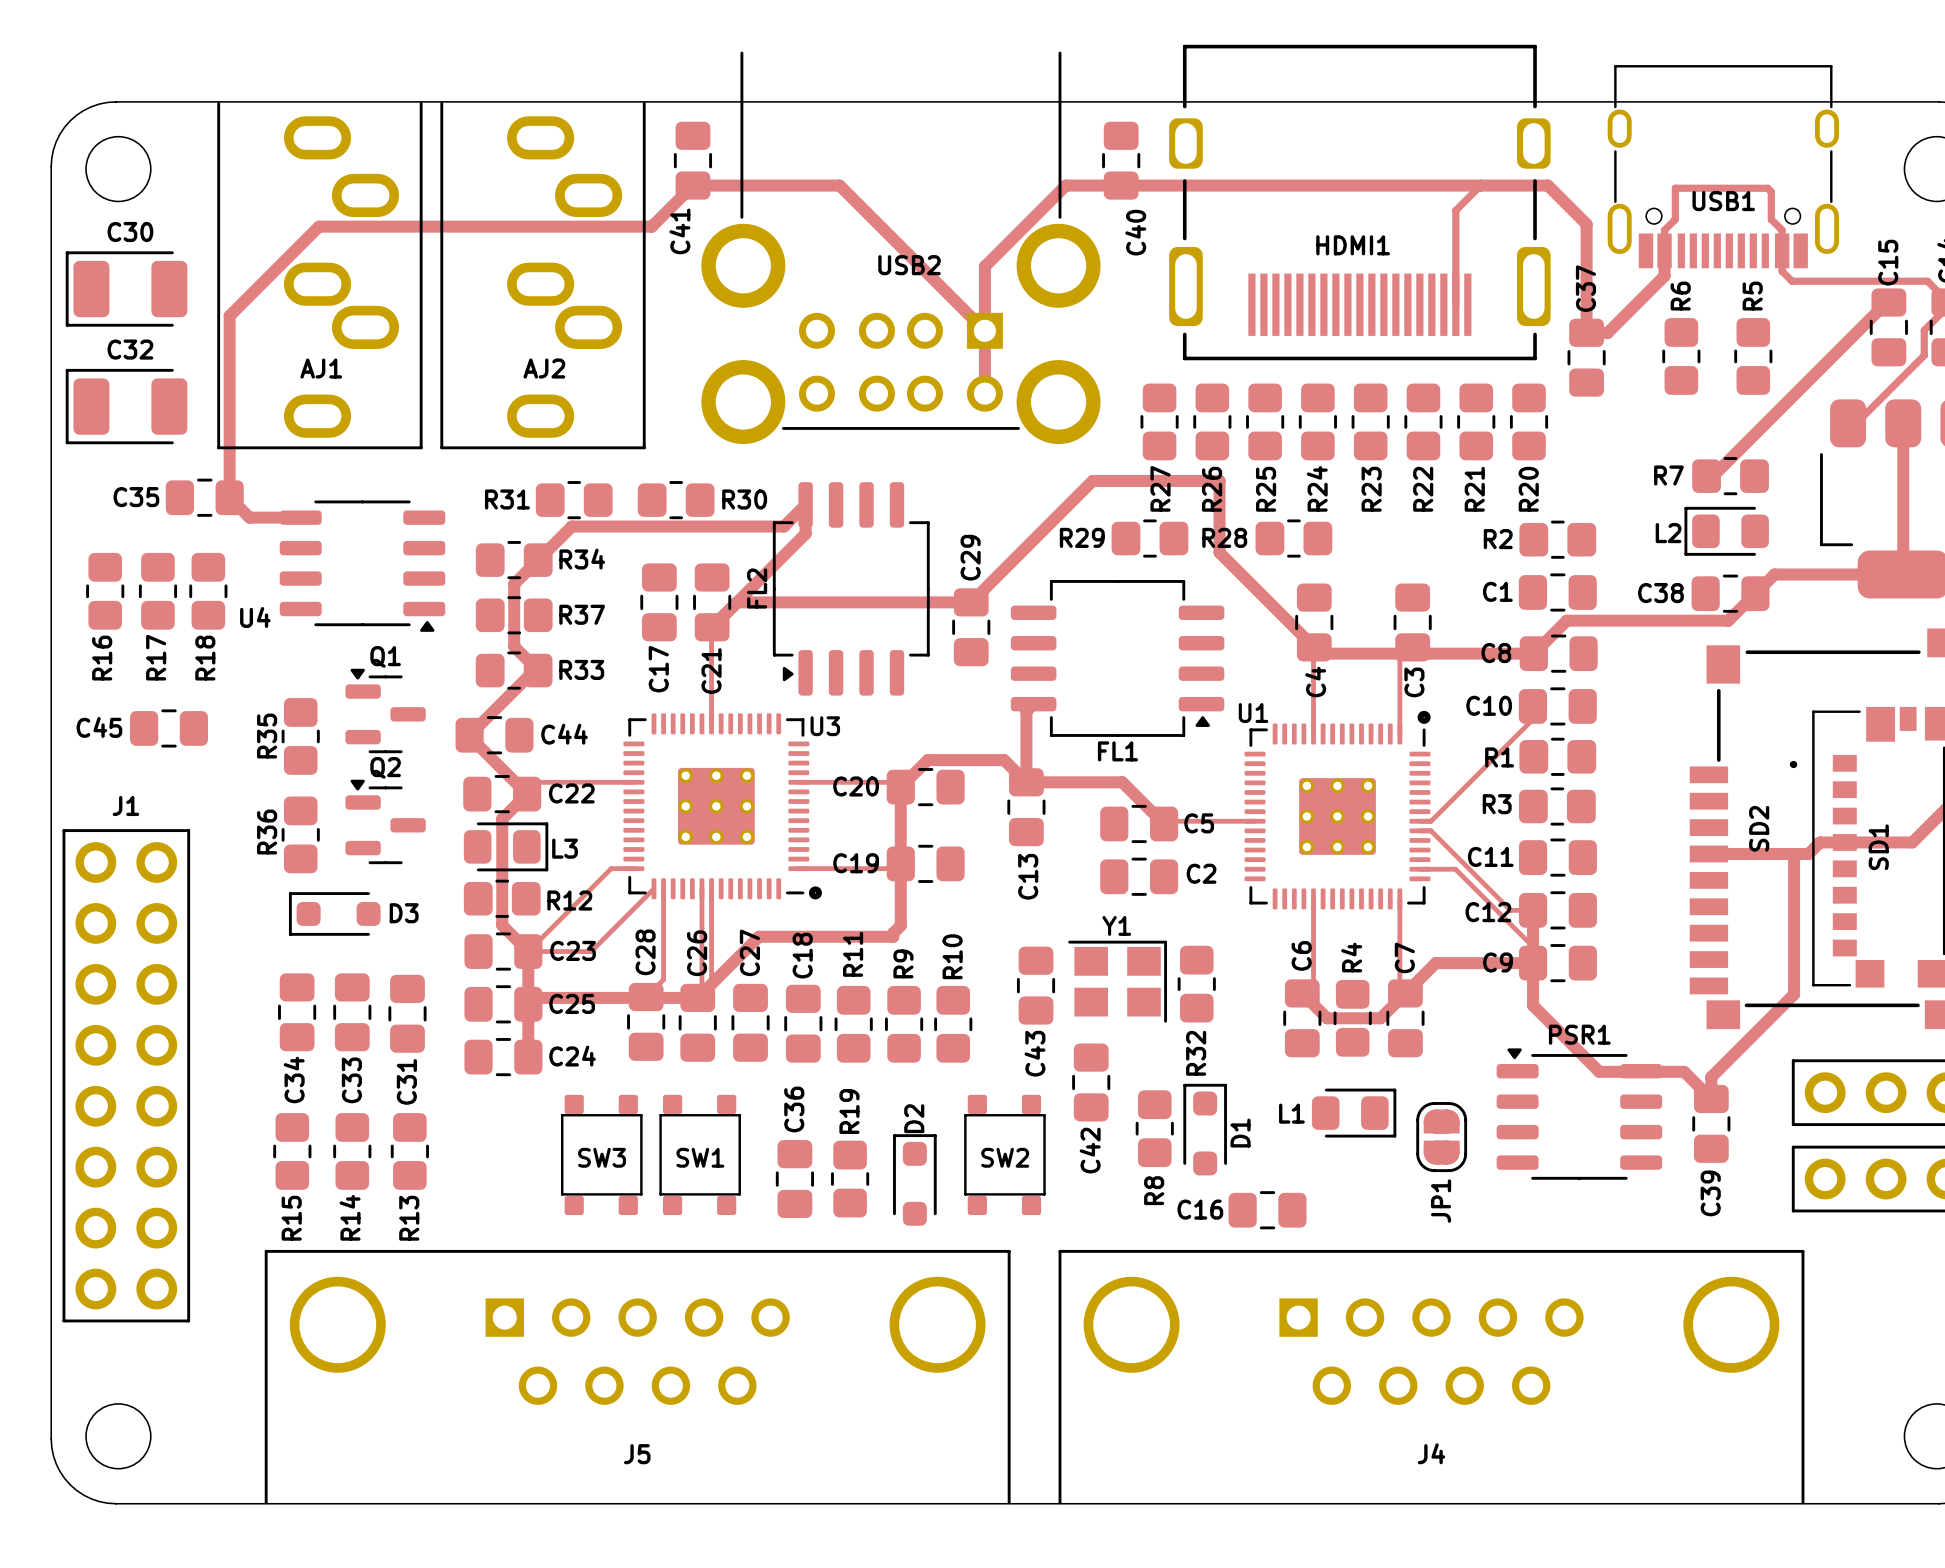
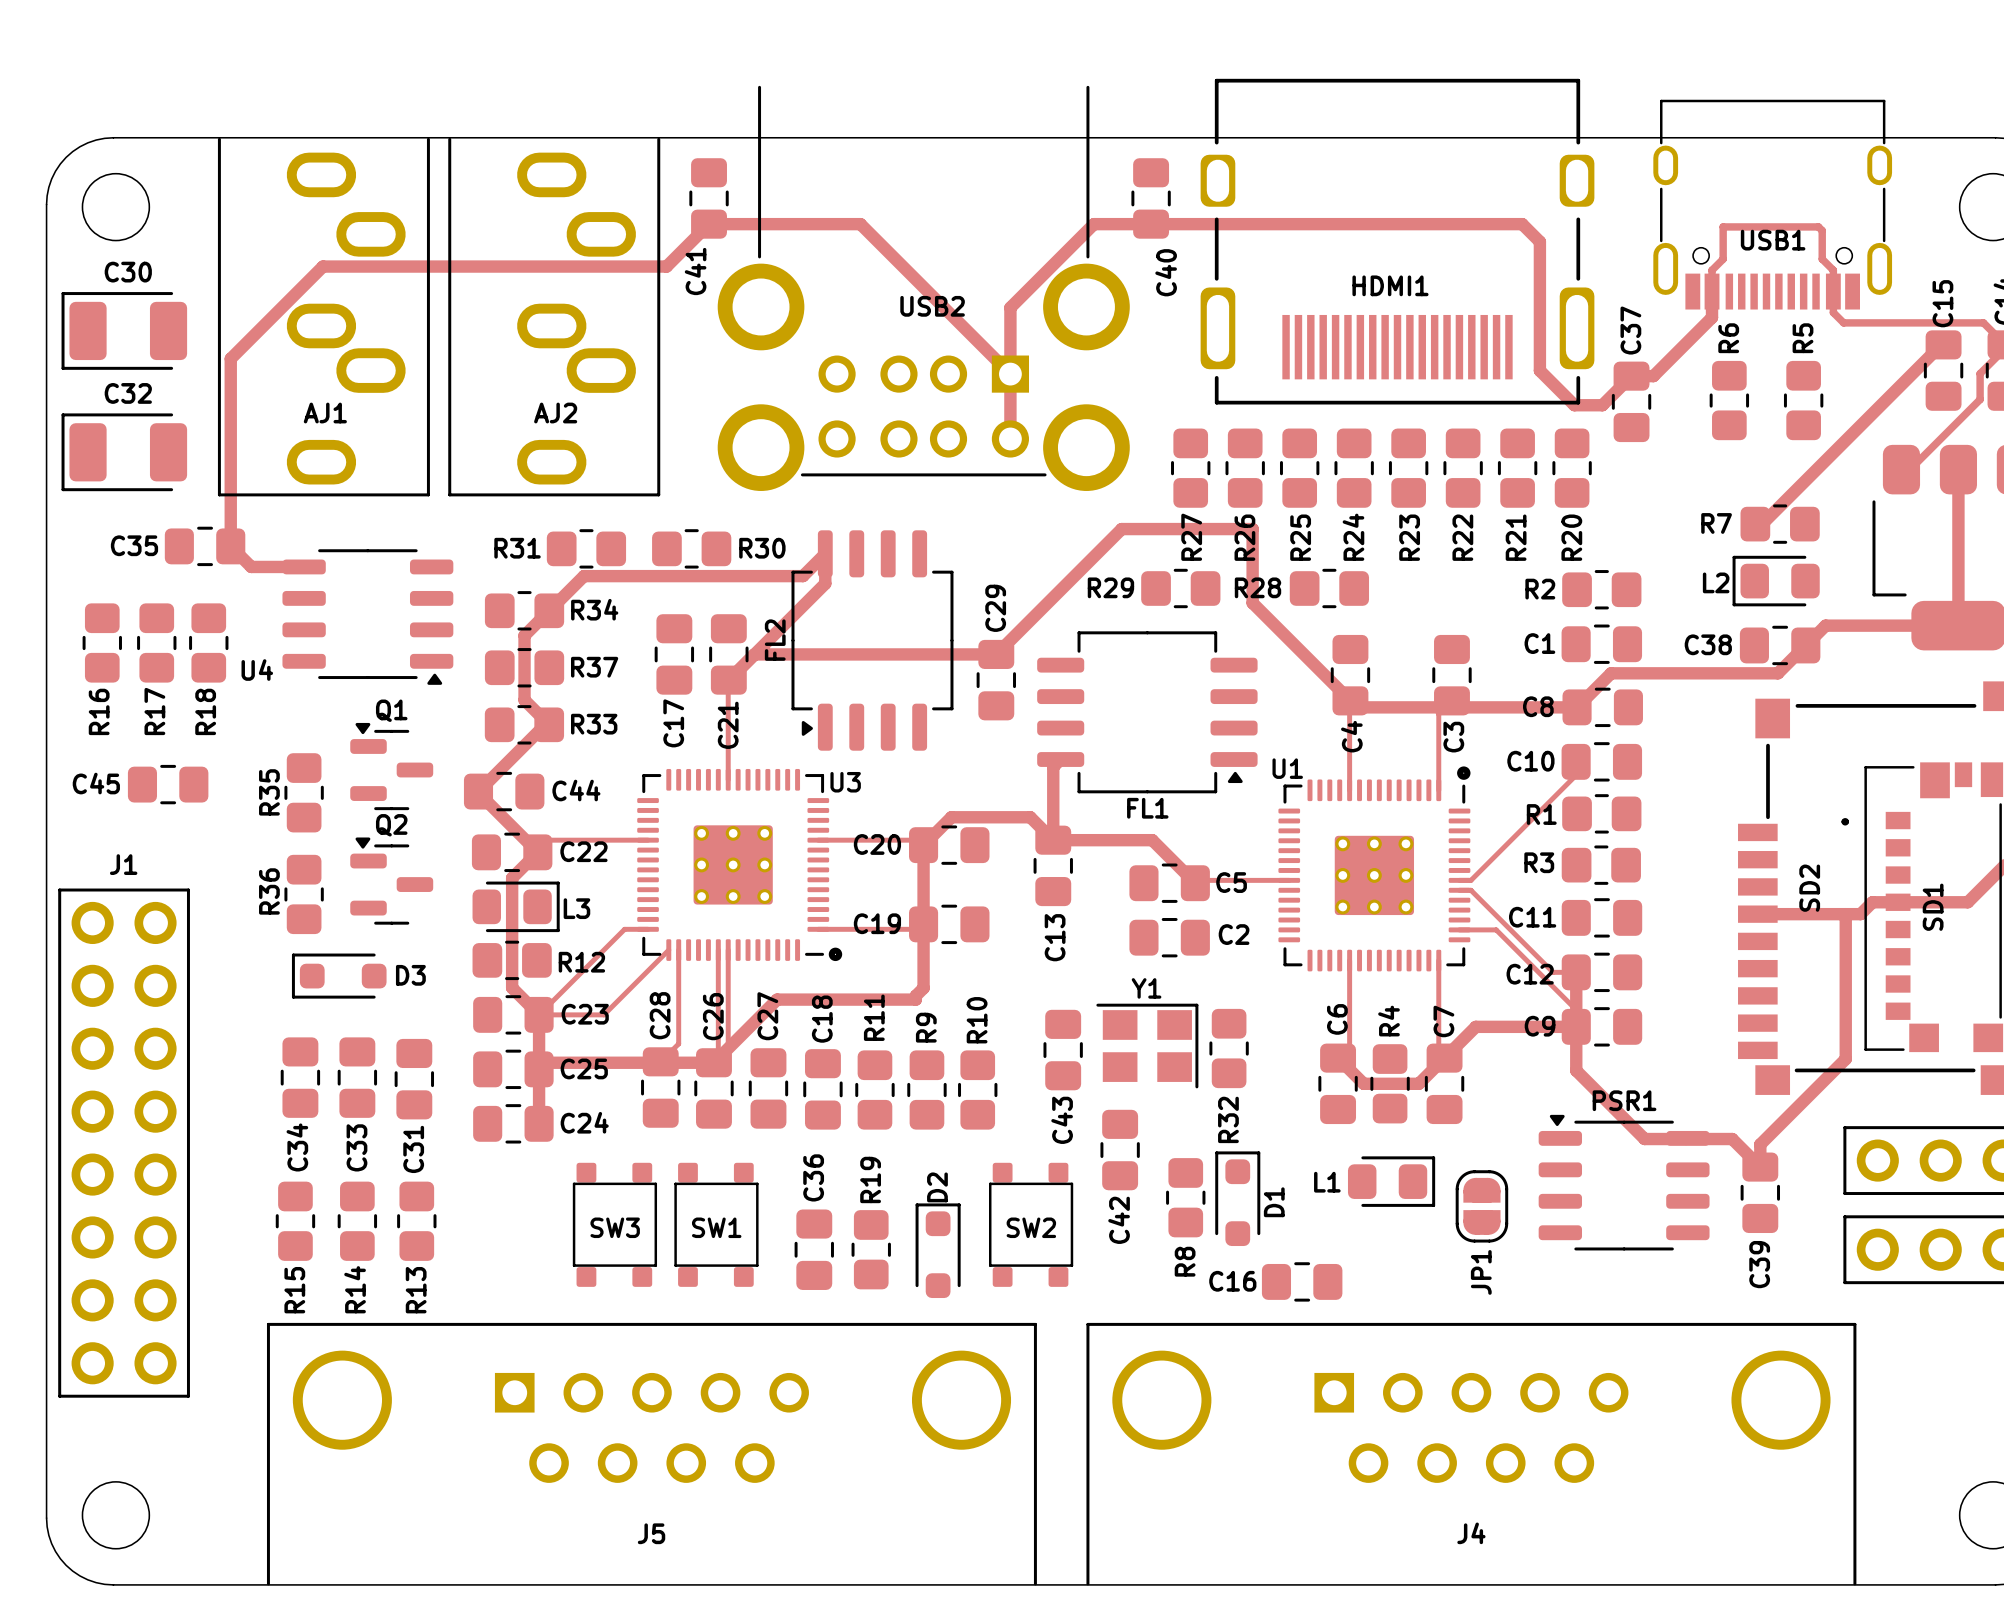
track: (1455, 304) (1455, 210) (1480, 185) (1547, 185) (1586, 224) (1586, 332) -> (1522, 224) (1539, 241) (1539, 370) (1574, 405) (1602, 405) (1631, 376)

